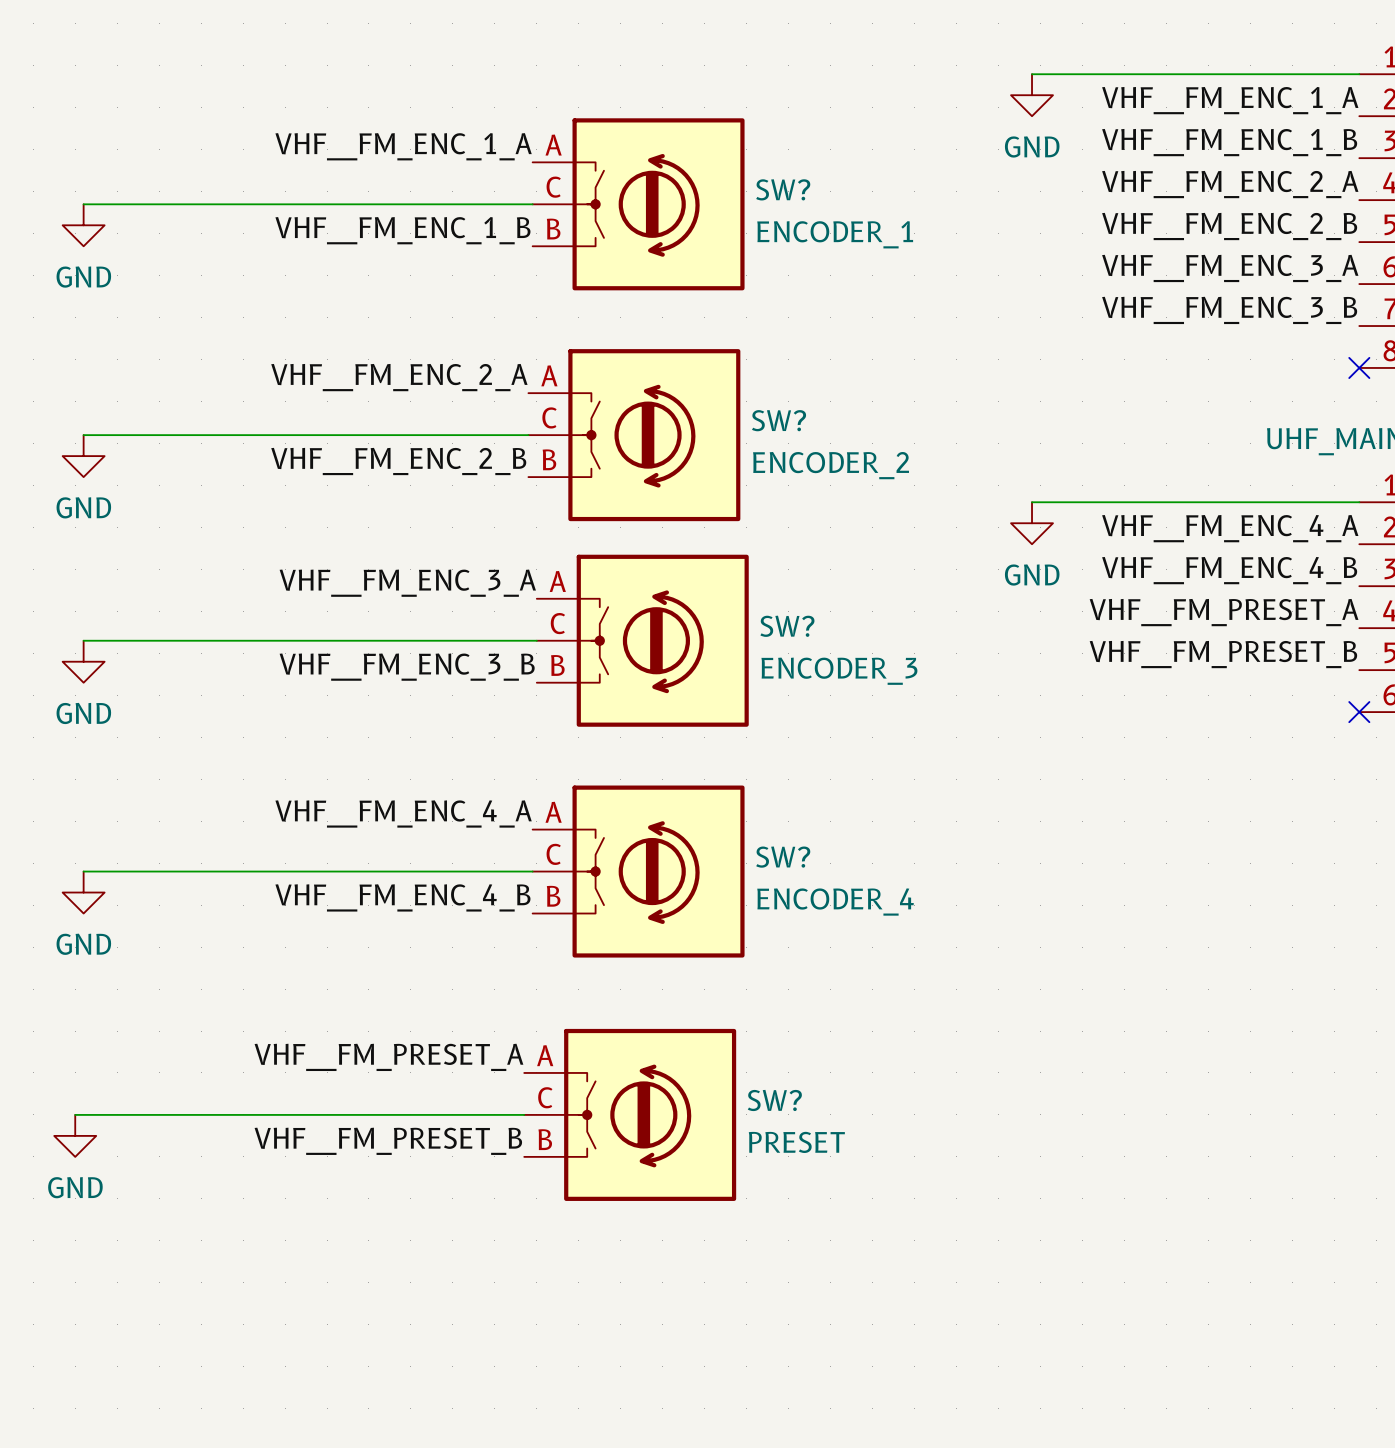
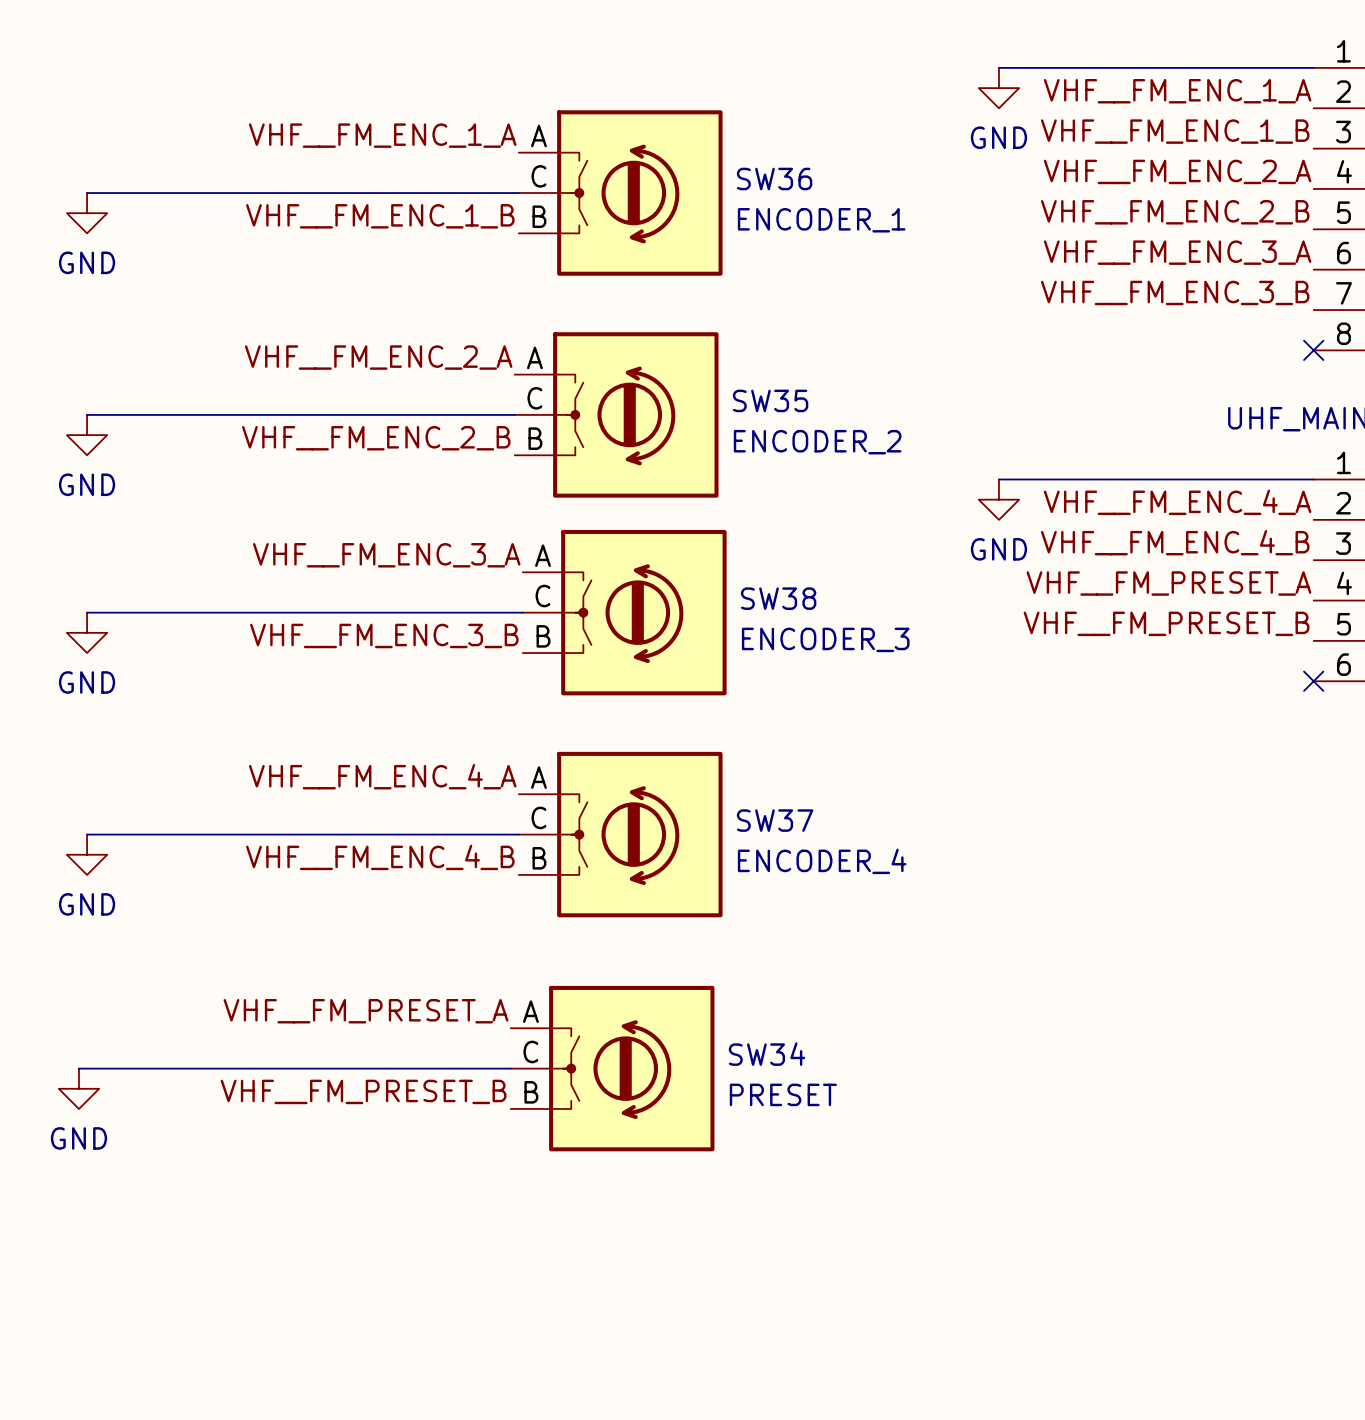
SW? name: SW? (783, 189) -> SW36 (774, 179)
SW? name: SW? (779, 420) -> SW35 (770, 400)
SW? name: SW? (787, 626) -> SW38 (778, 598)
SW? name: SW? (783, 857) -> SW37 (775, 820)
SW? name: SW? (774, 1100) -> SW34 (767, 1054)

